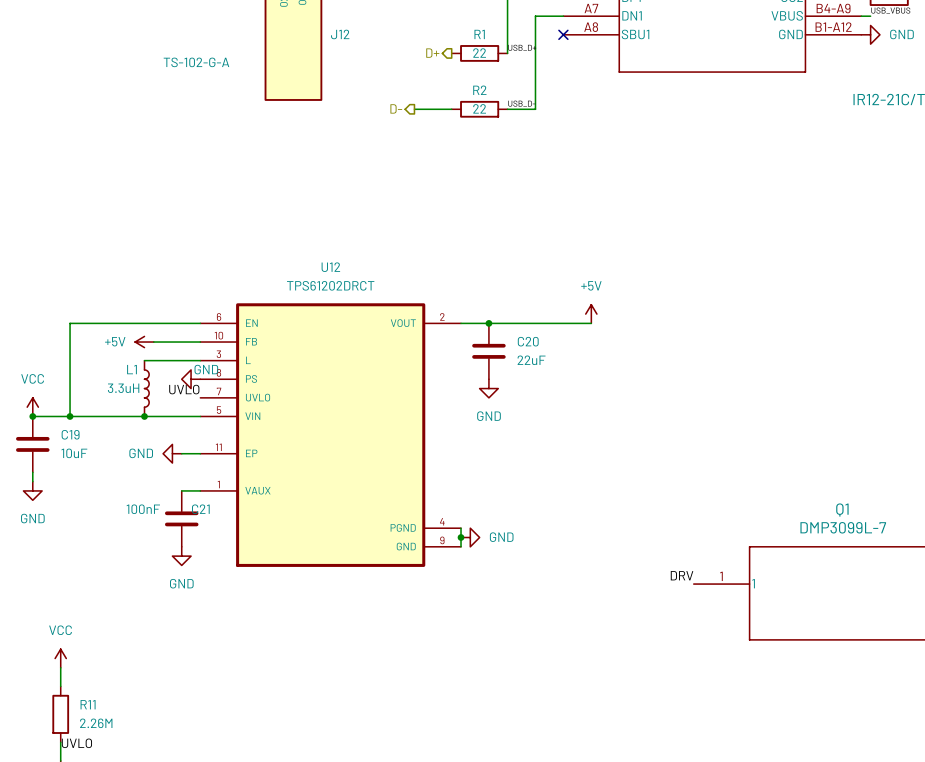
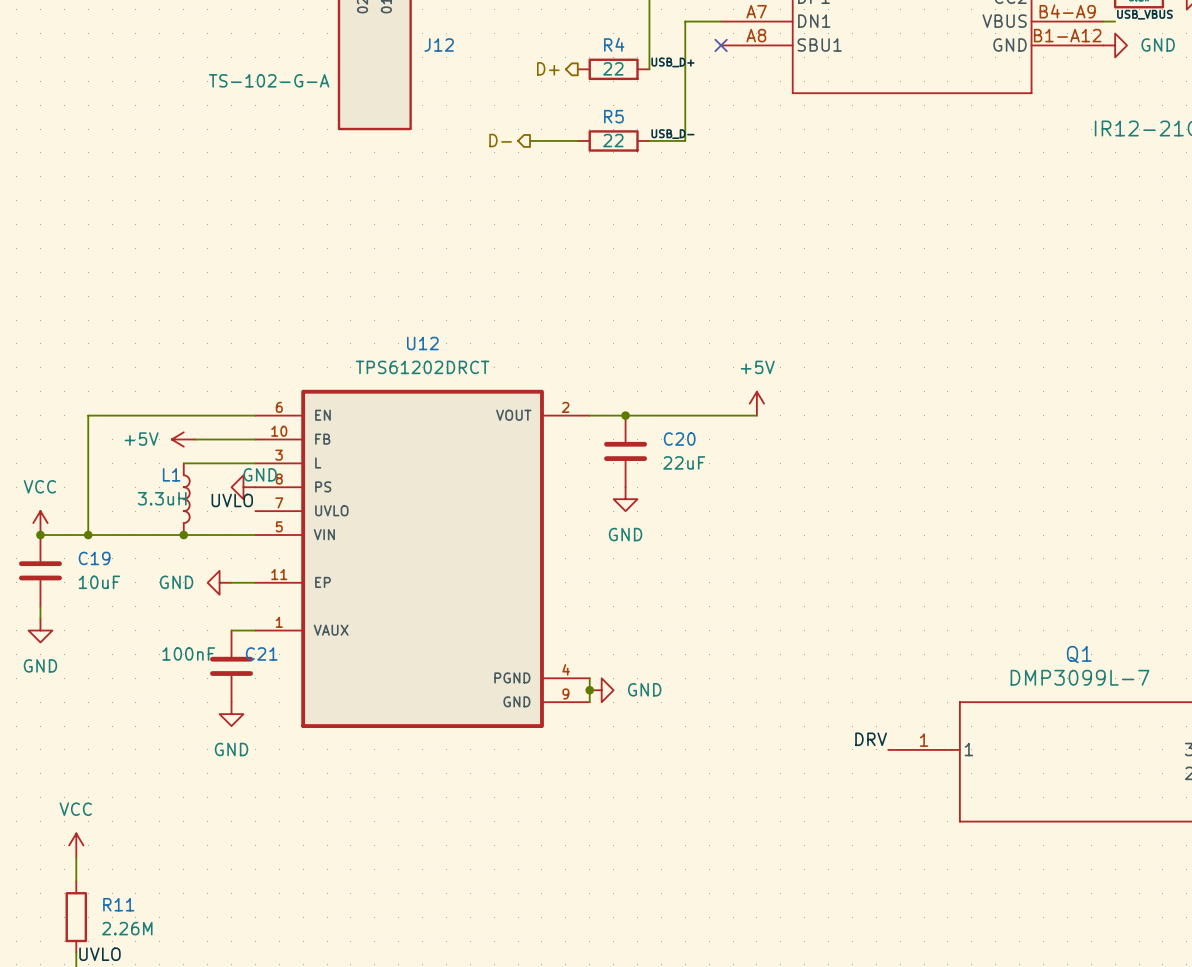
R1 name: R1 (479, 34) -> R4 (614, 44)
R2 name: R2 (479, 90) -> R5 (613, 116)

